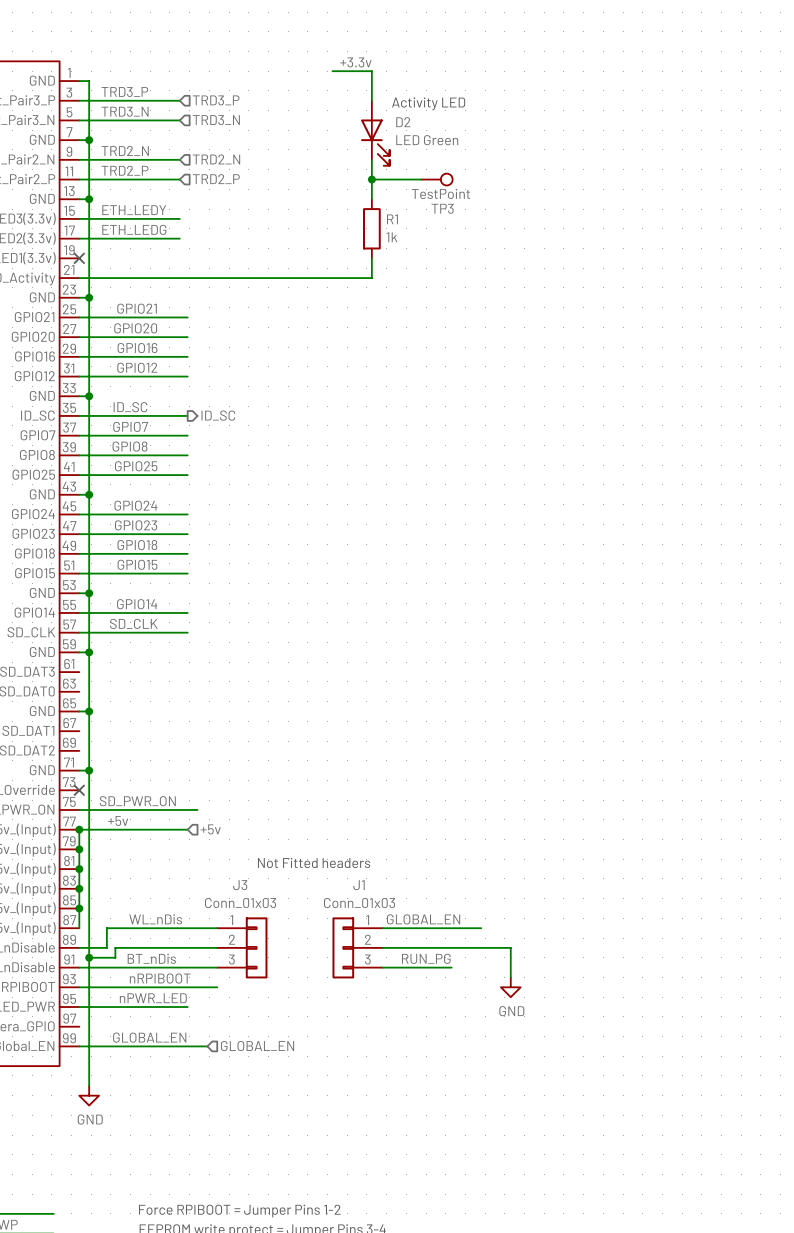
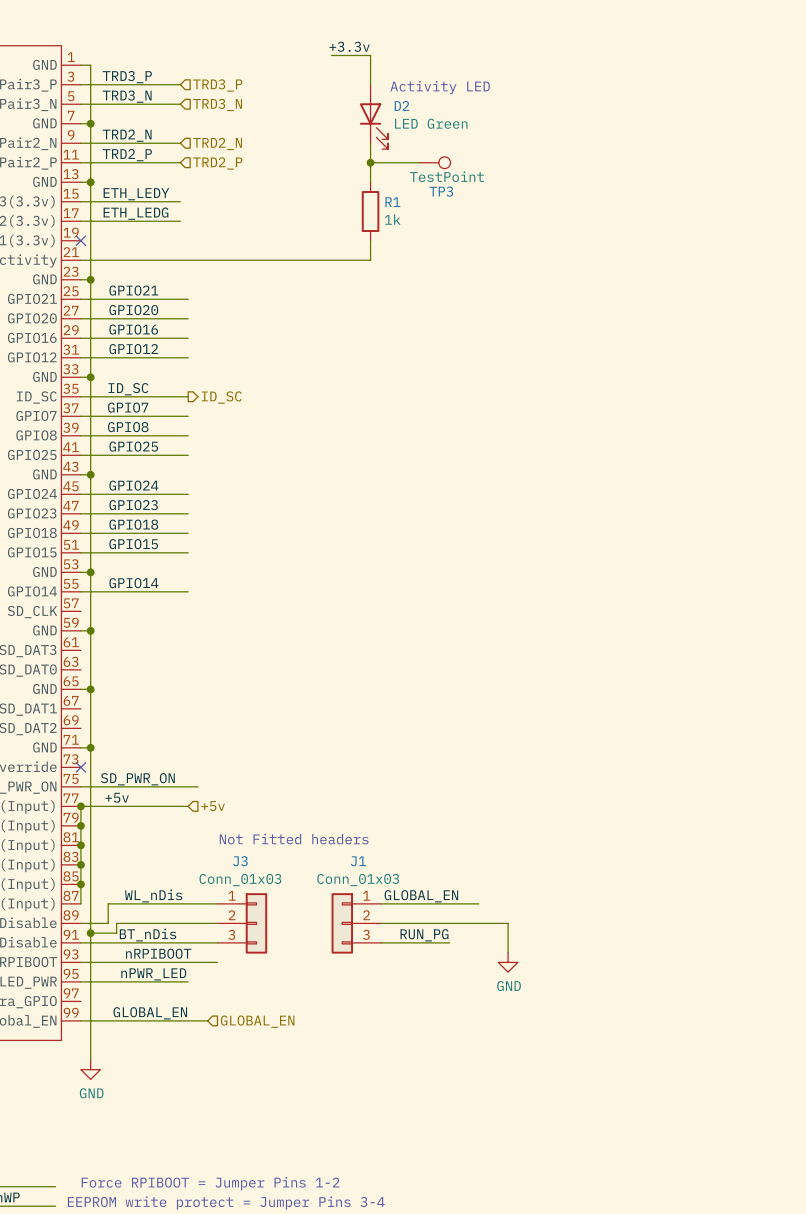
label: SD_CLK (133, 623) -> none
wire: (79, 632) (187, 632) -> none

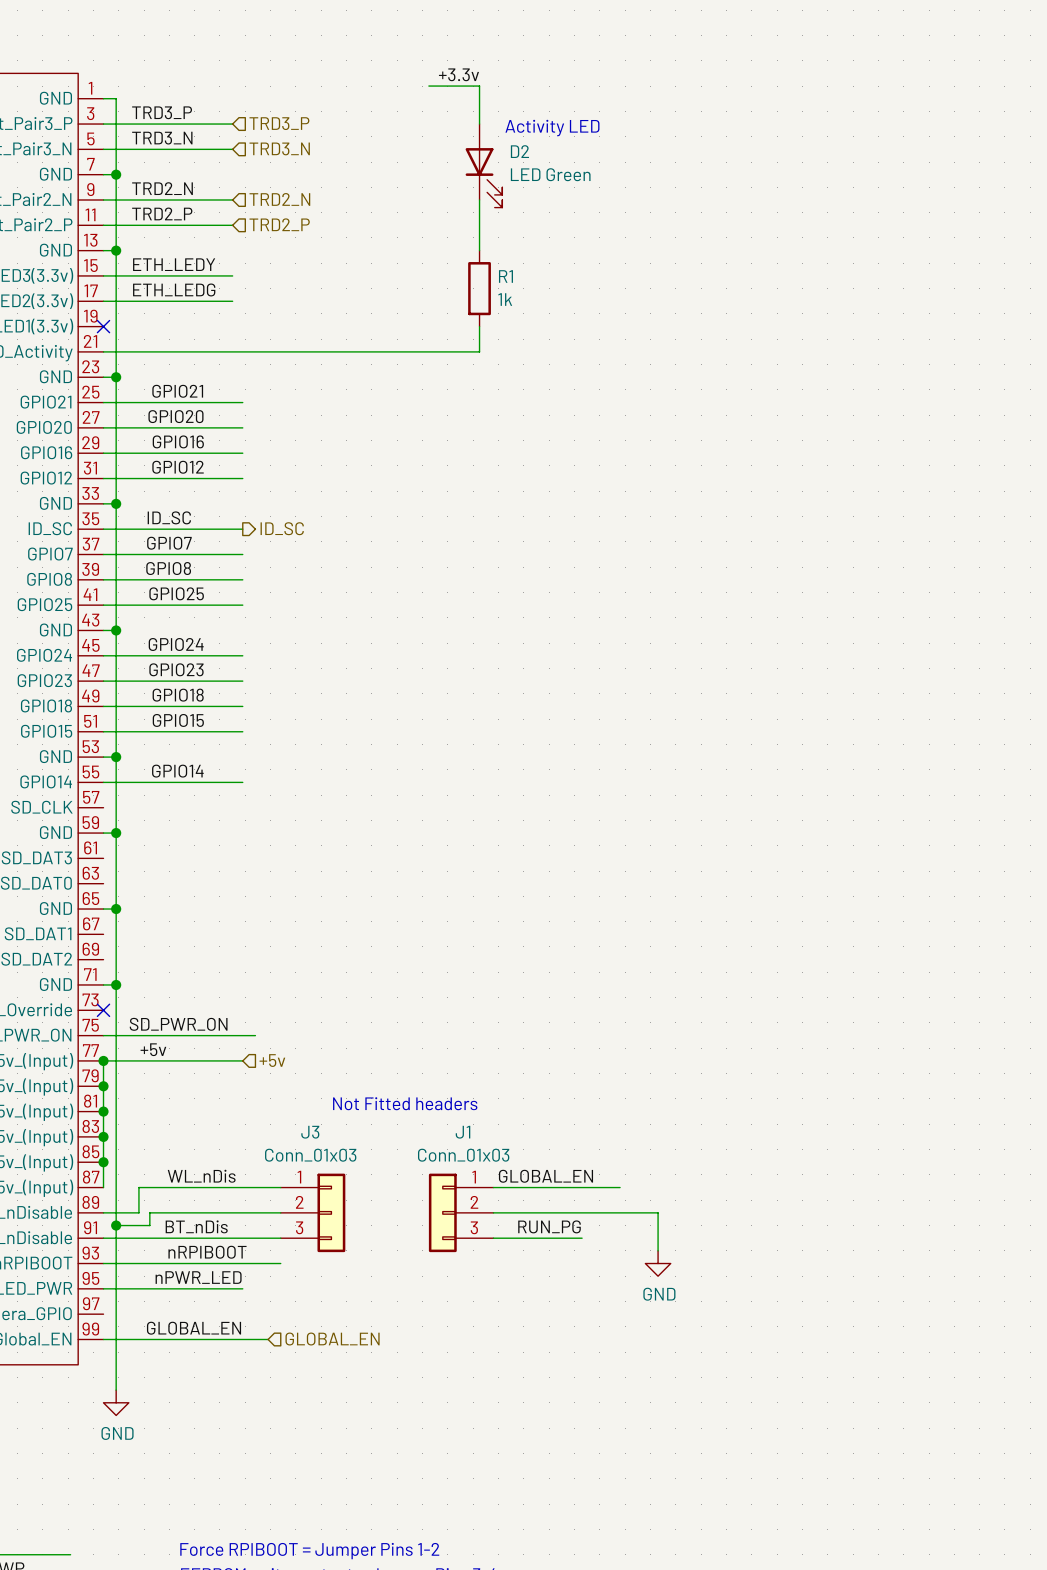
wire: (370, 162) (419, 162) -> none
junction: (370, 162) -> none
TP3: TestPoint (434, 162) -> none

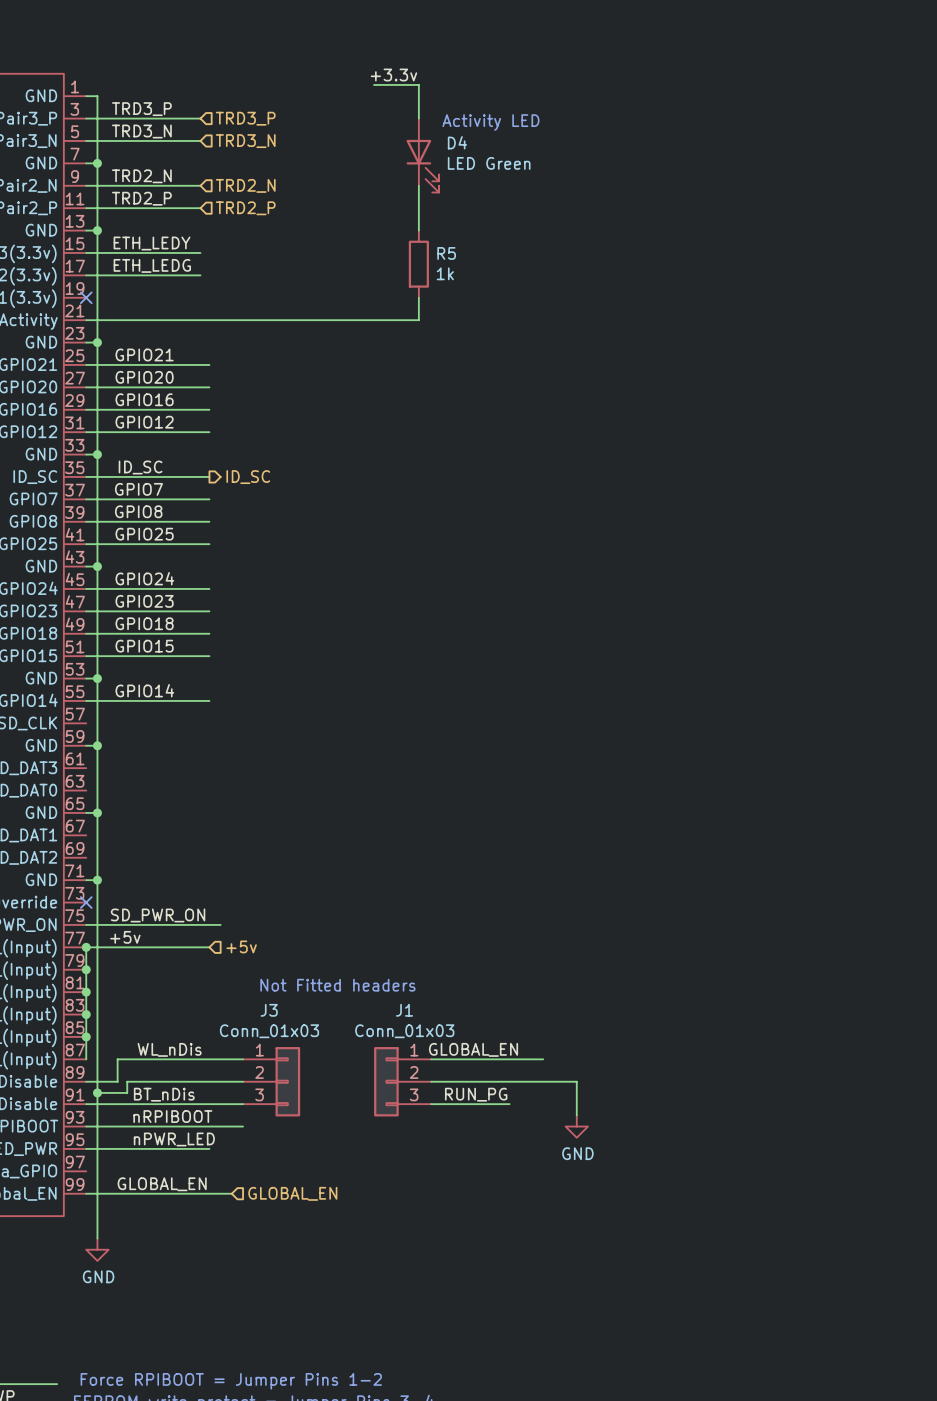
D2 name: D2 (519, 151) -> D4 (457, 142)
R1 name: R1 (505, 276) -> R5 (446, 253)

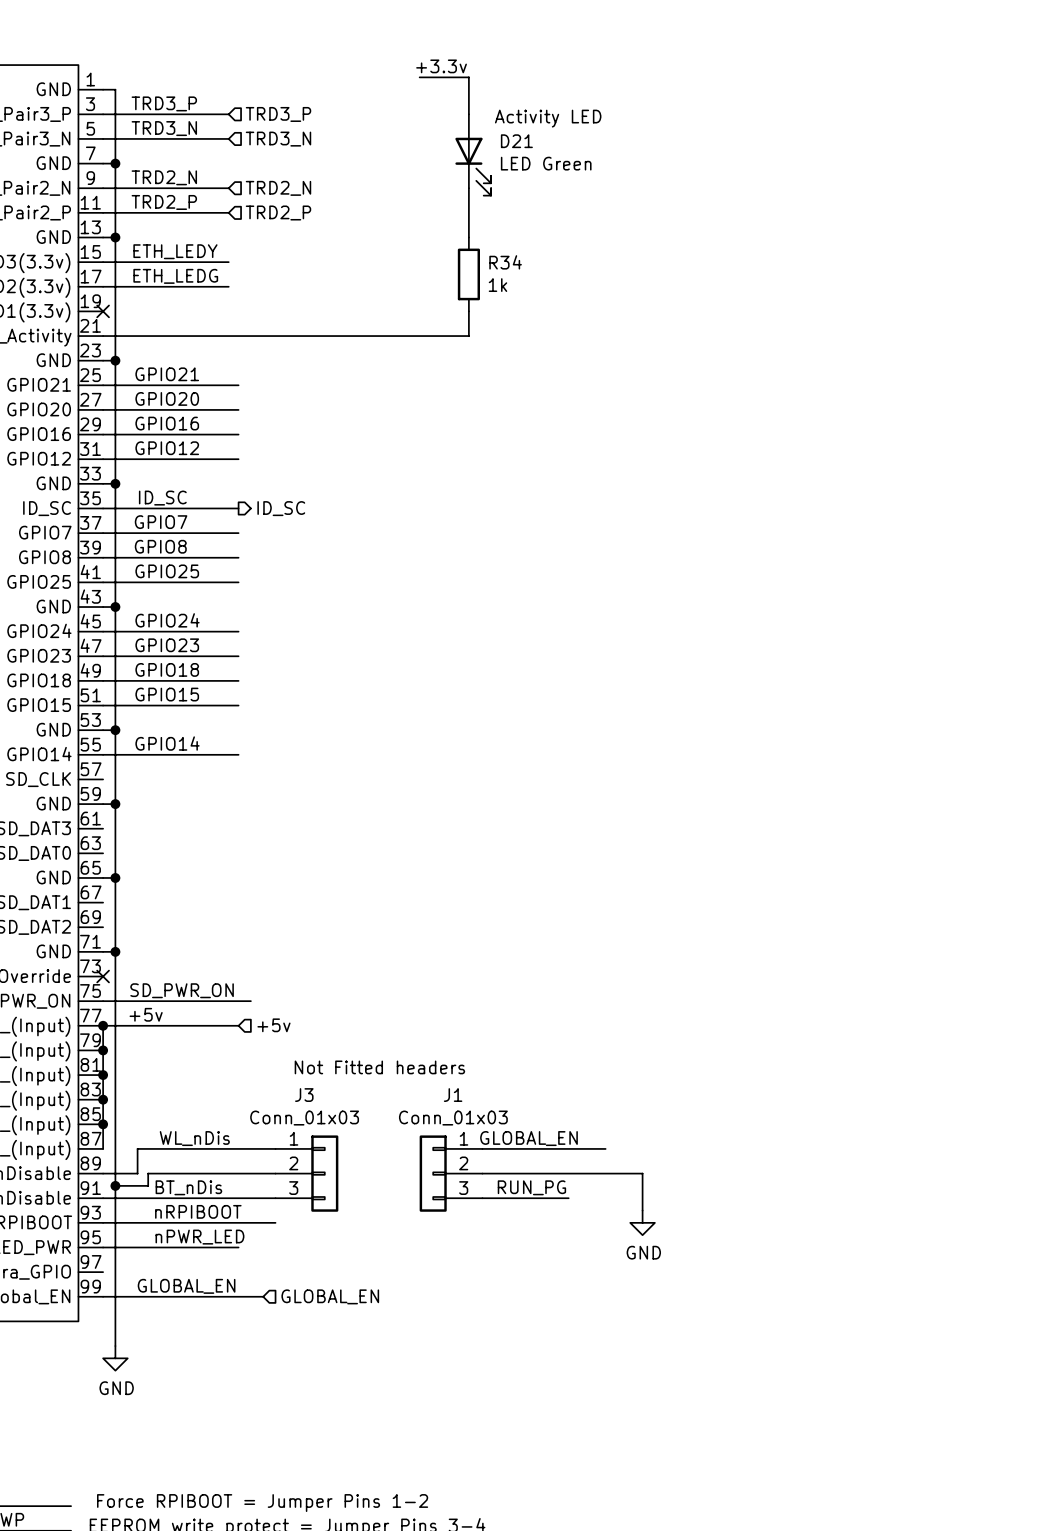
D4 name: D4 (457, 142) -> D21 (516, 141)
R5 name: R5 (446, 253) -> R34 (505, 262)

